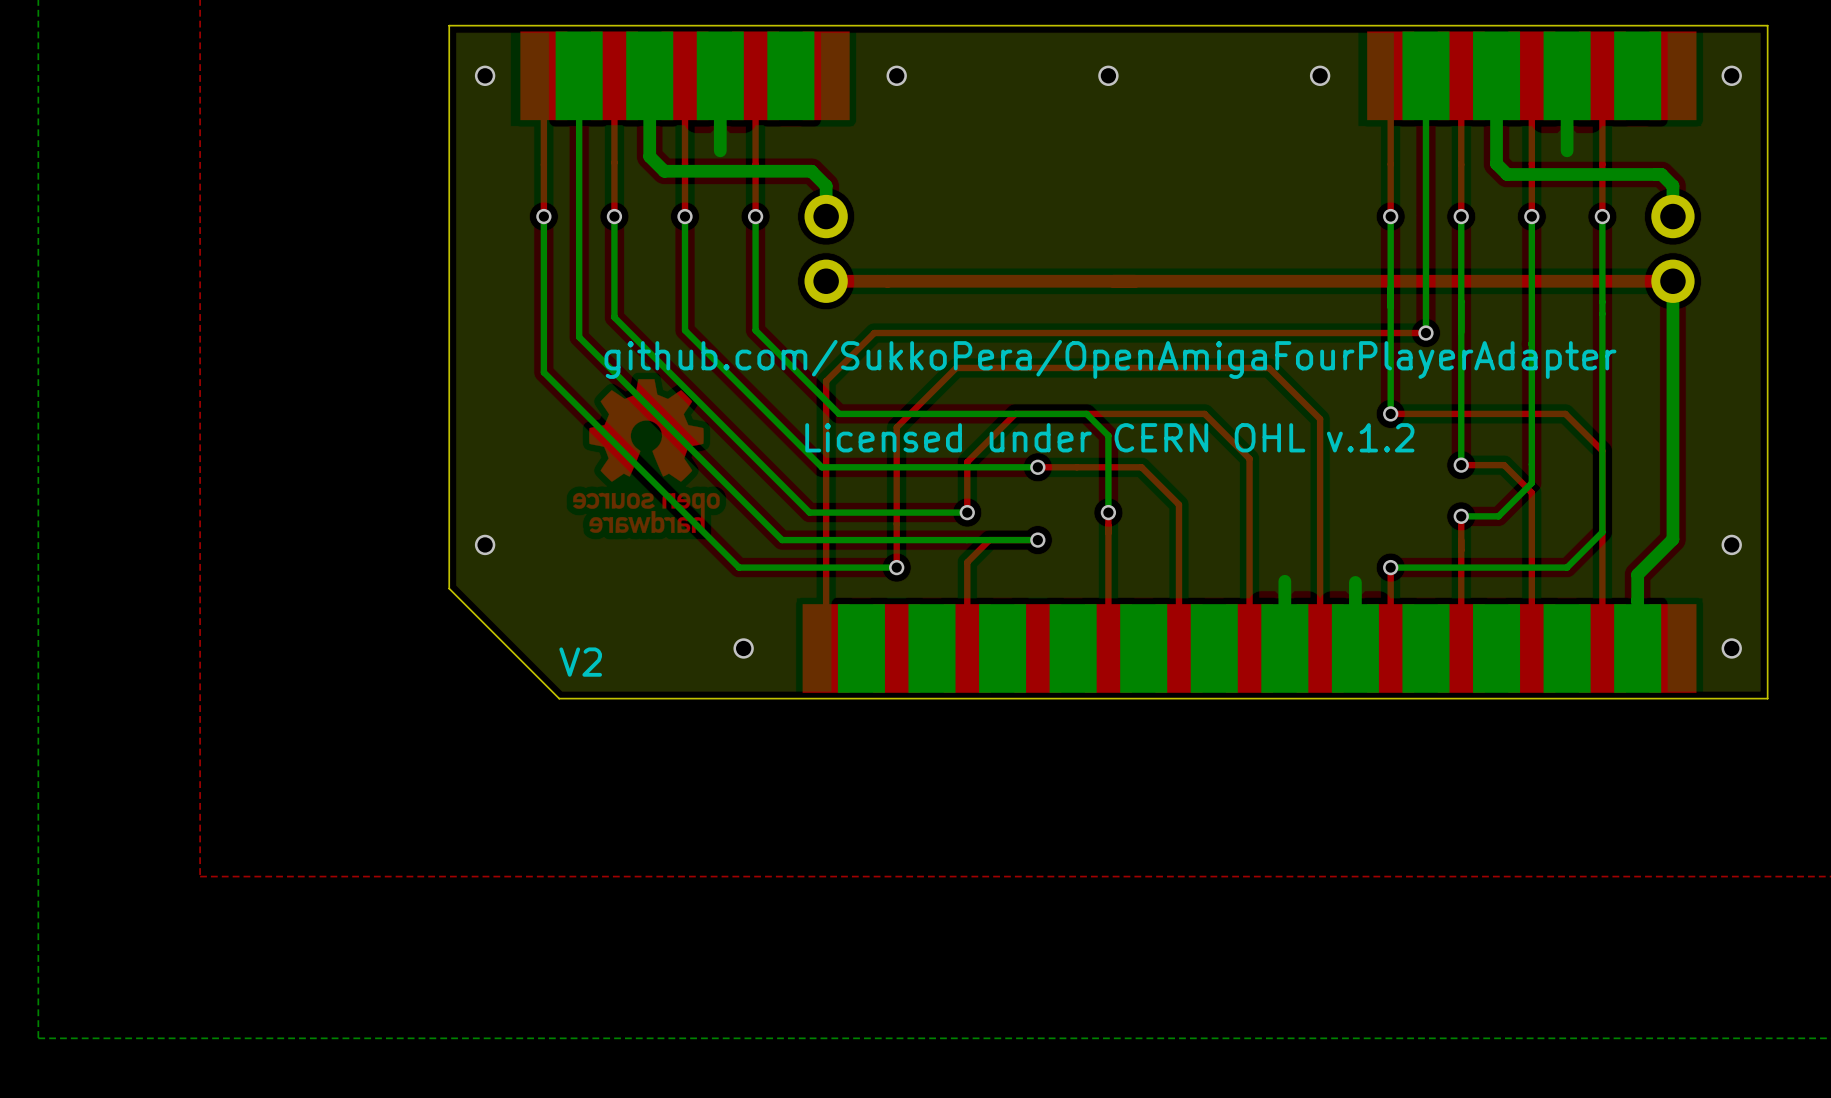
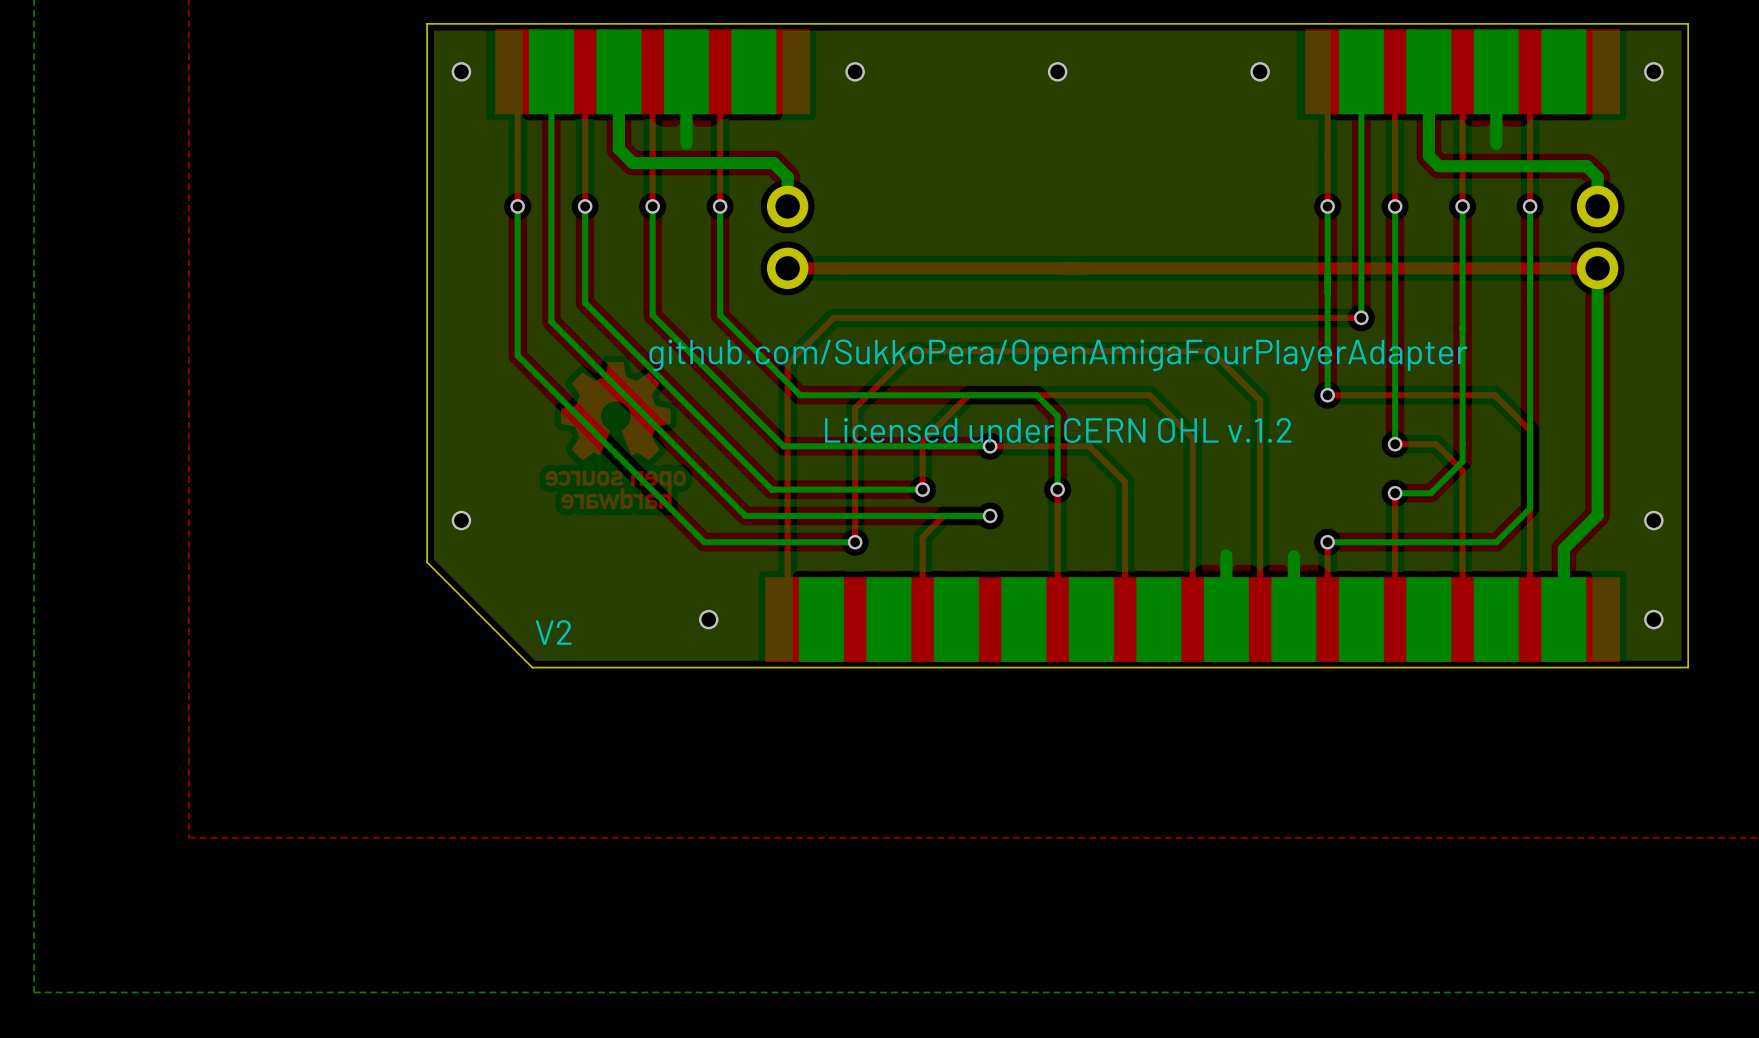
text position: github.com/SukkoPera/OpenAmigaFourPlayerAdapter (1110, 359) -> github.com/SukkoPera/OpenAmigaFourPlayerAdapter (1058, 355)
text position: Licensed under CERN OHL v.1.2 (1109, 437) -> Licensed under CERN OHL v.1.2 (1058, 430)

